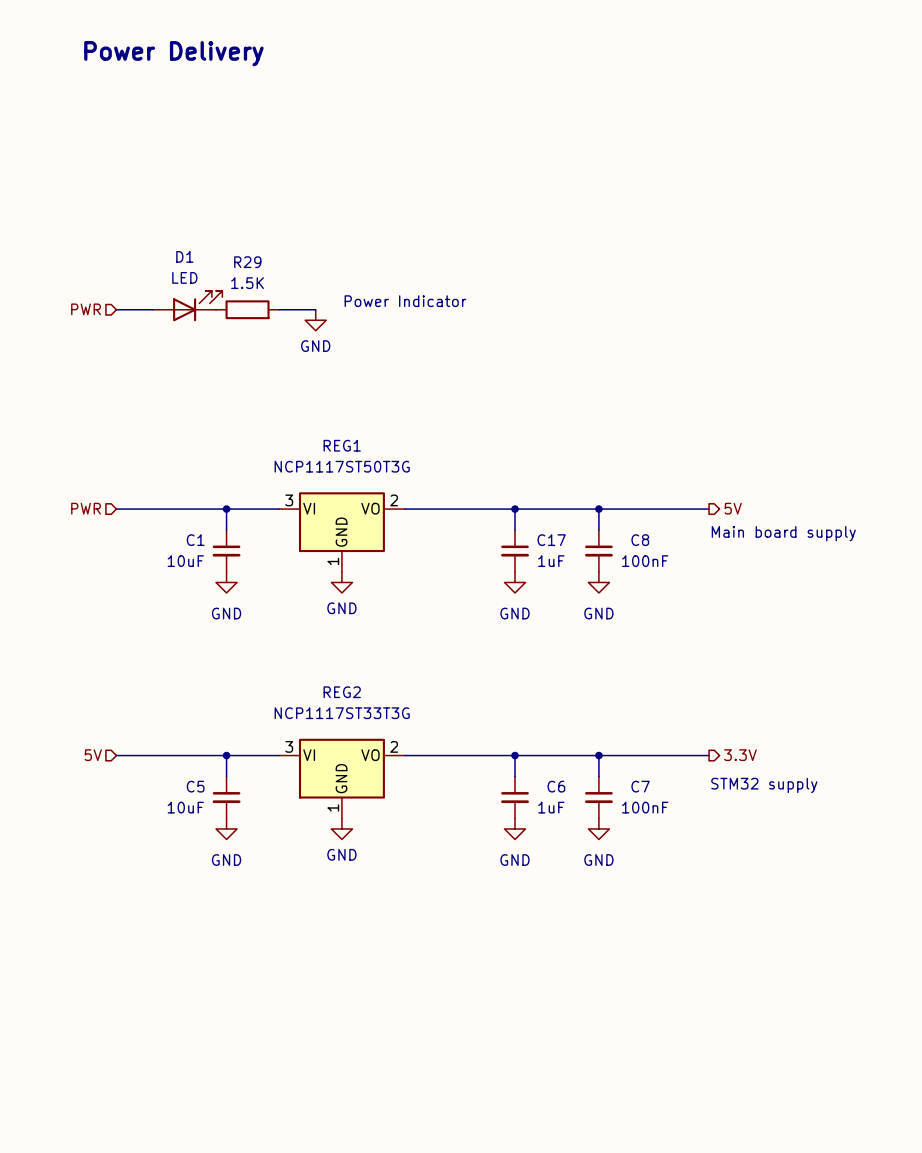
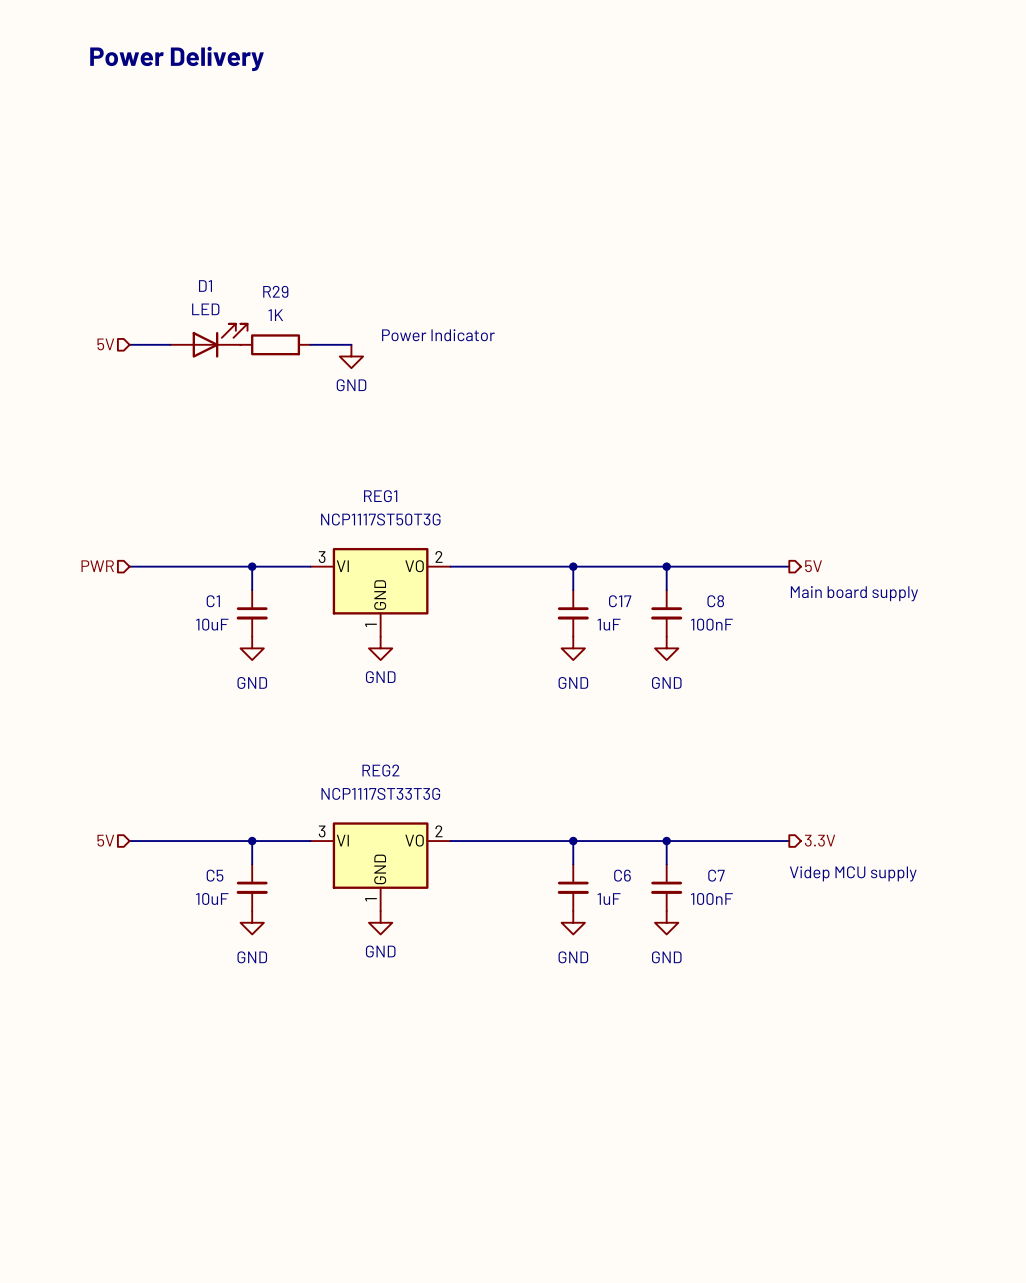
R29 value: 1.5K (247, 283) -> 1K (275, 315)
hierarchical label: PWR (86, 309) -> 5V (105, 344)
text: STM32 supply (764, 785) -> Videp MCU supply (853, 873)

